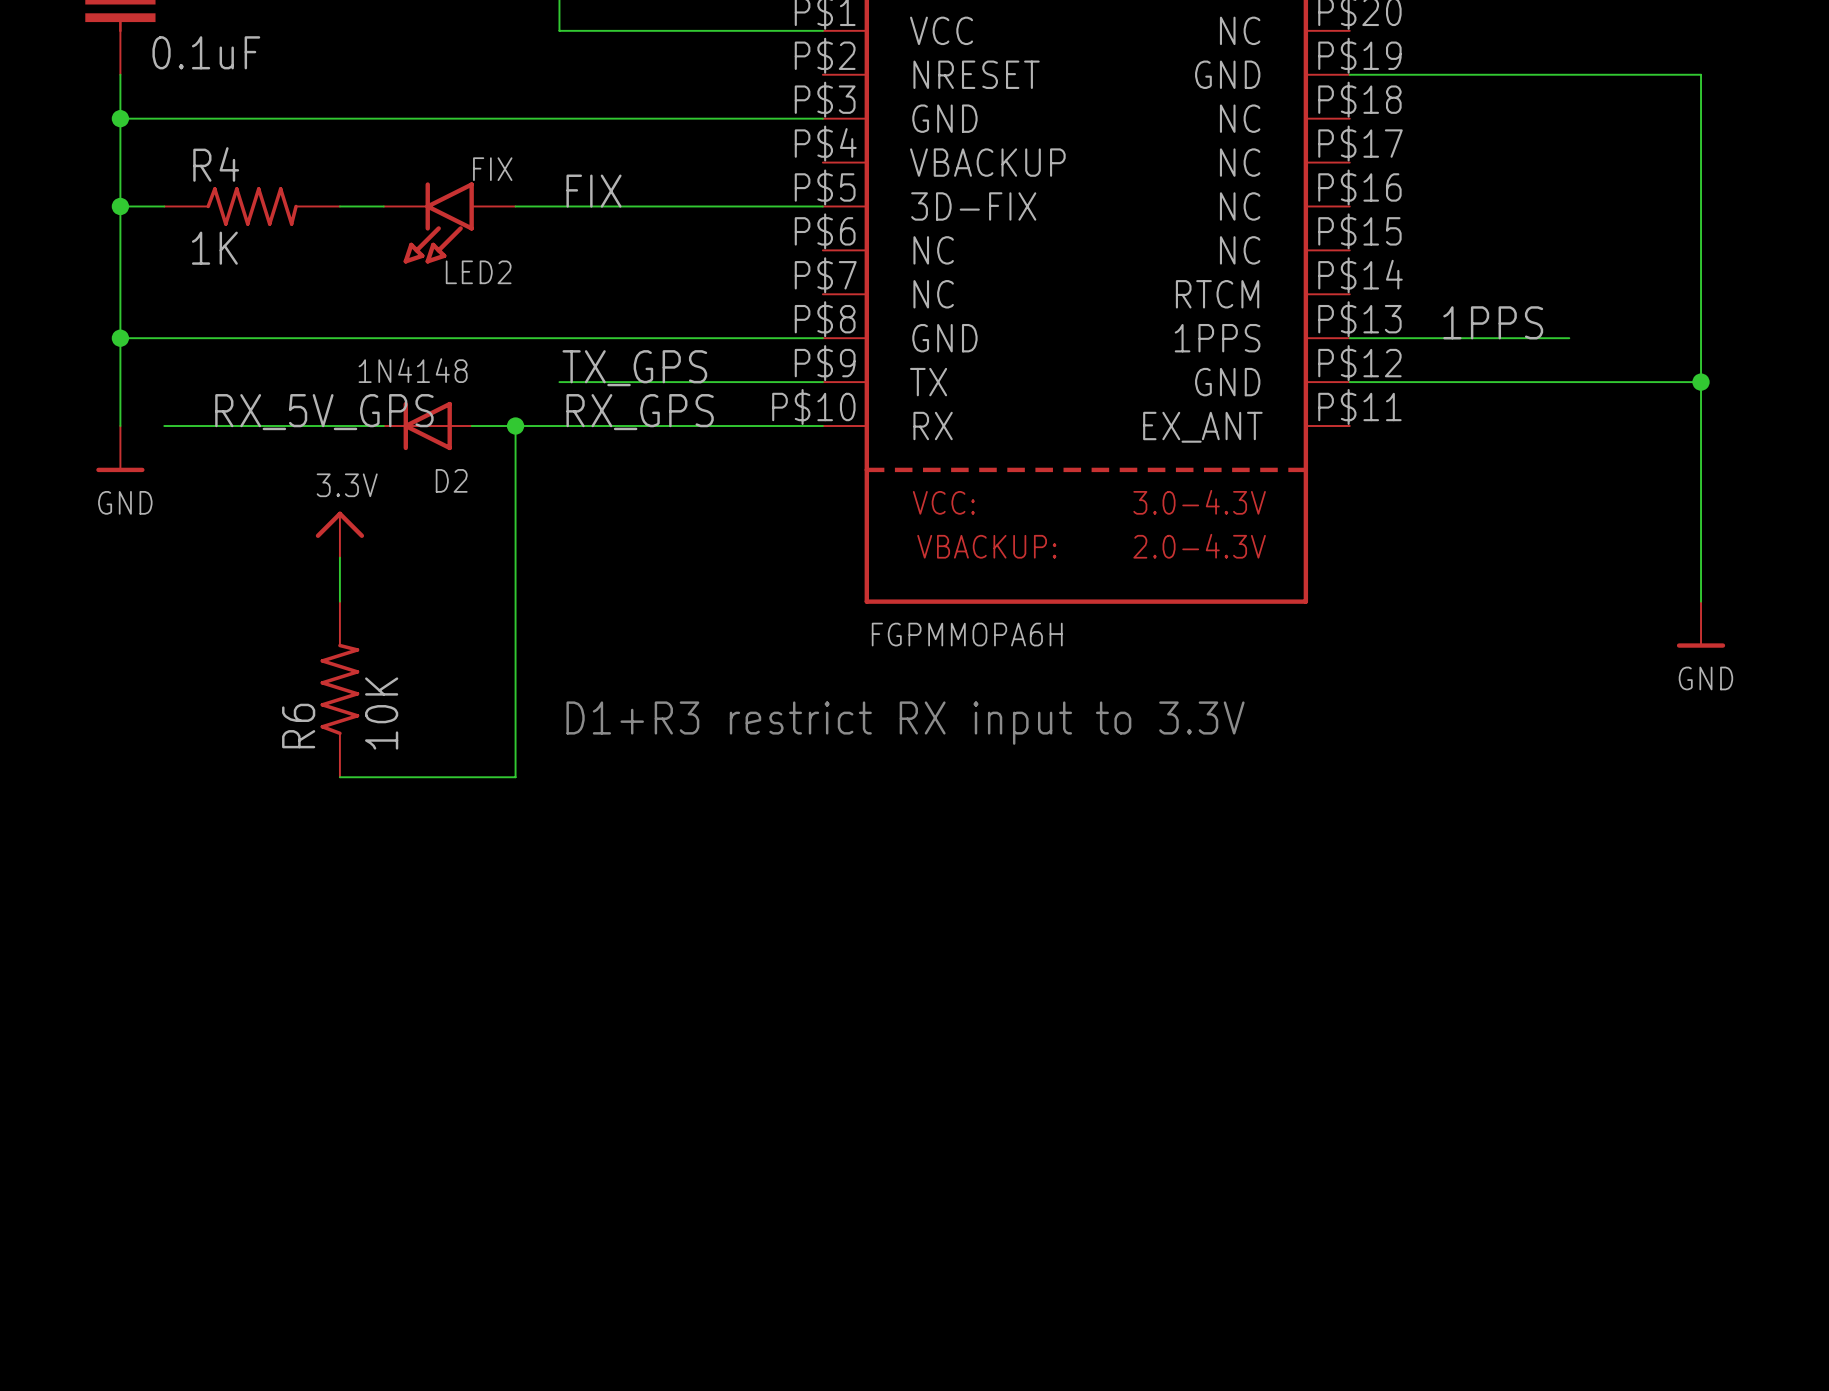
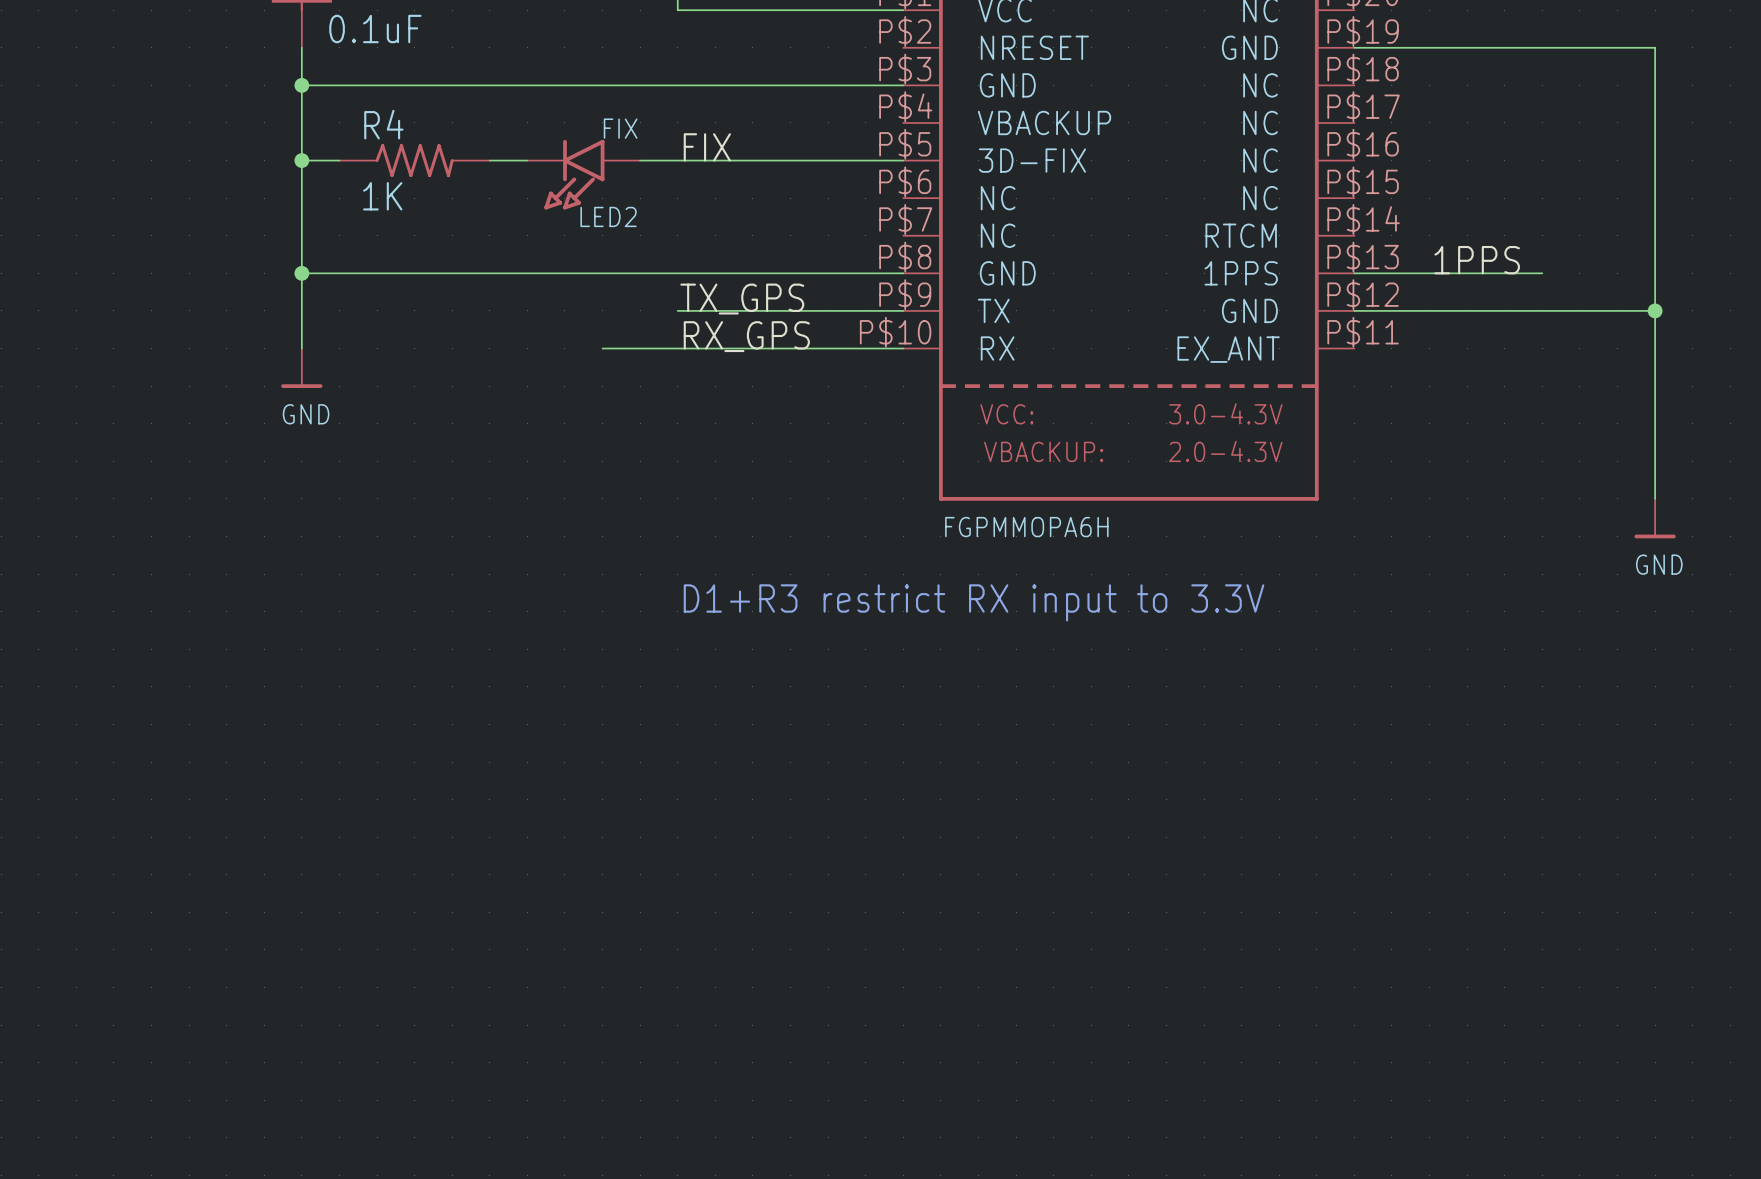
label: RX_5V_GPS (324, 412) -> none
wire: (164, 426) (383, 426) -> none
D2: 1N4148 (427, 426) -> none
wire: (515, 426) (515, 777) (339, 777) -> none
junction: (515, 426) -> none
power symbol: 3.3V (339, 534) -> none
wire: (339, 557) (339, 601) -> none
R6: 10K (339, 689) -> none

